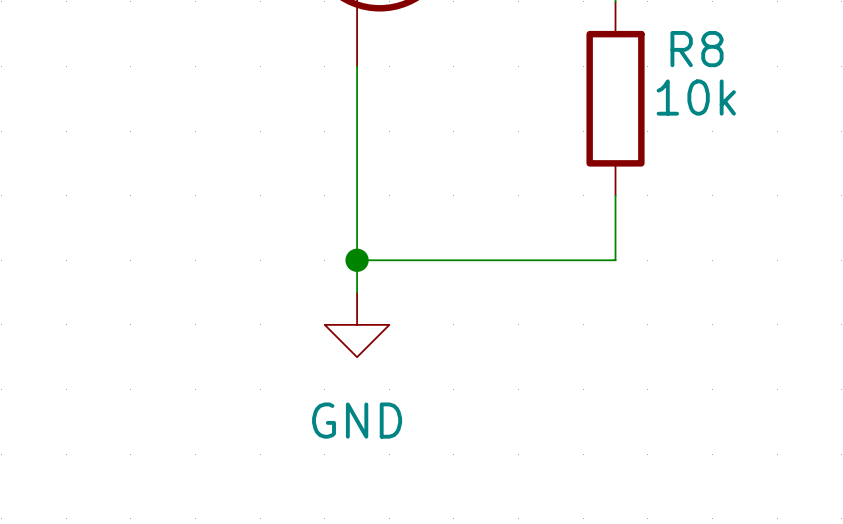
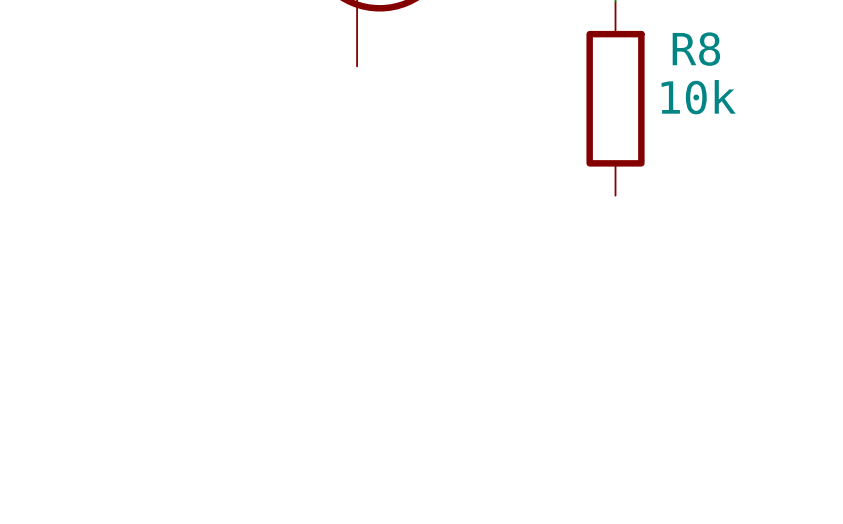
wire: (357, 66) (357, 292) -> none
wire: (615, 195) (615, 260) (357, 260) -> none
junction: (357, 260) -> none
power symbol: GND (357, 324) -> none

